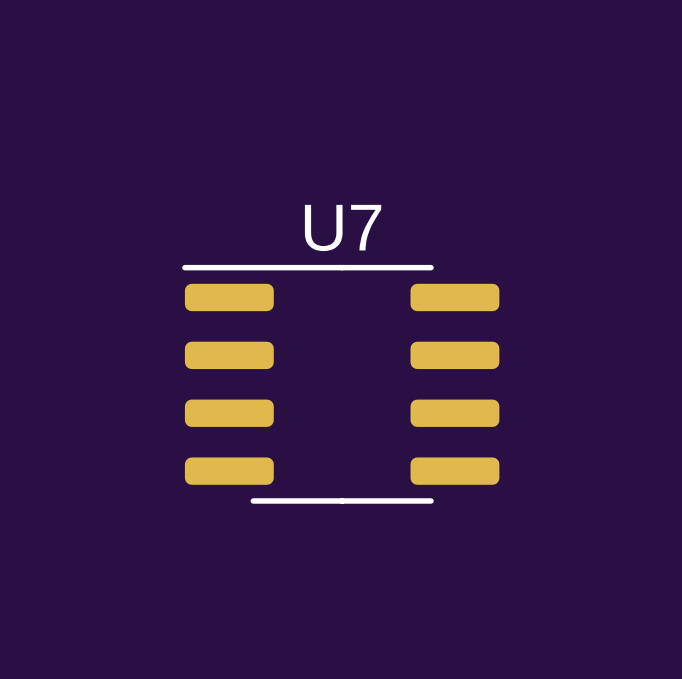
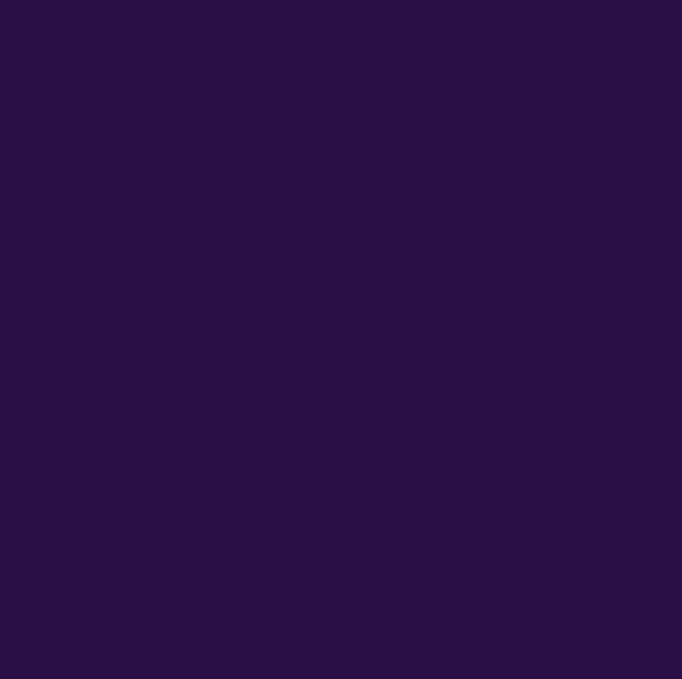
U7: (340, 384) -> none

